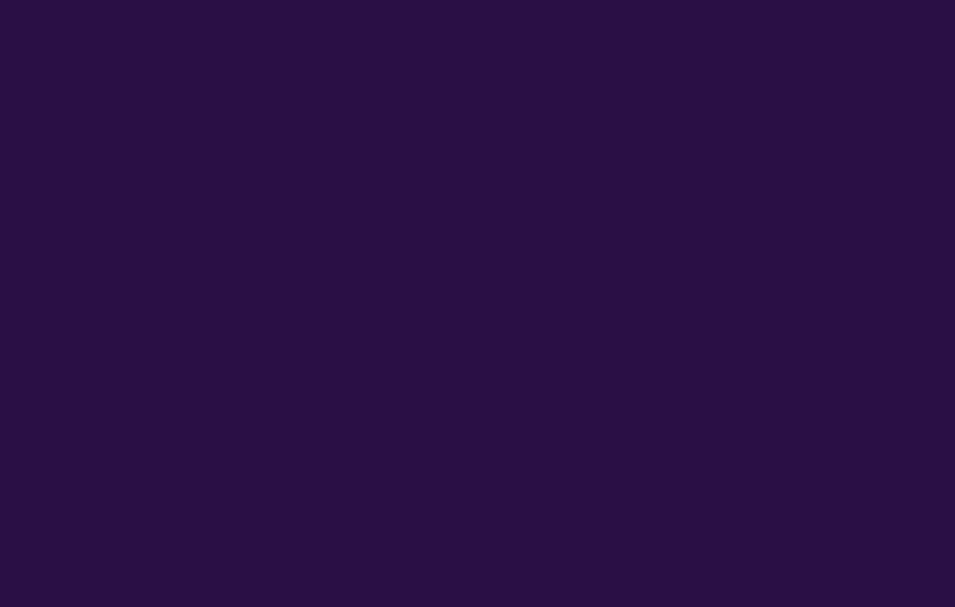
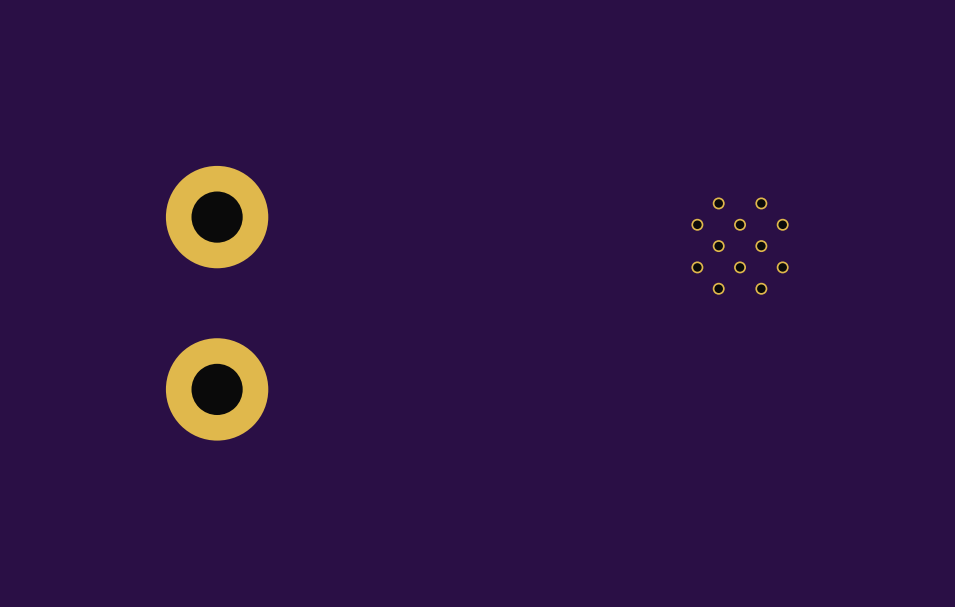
part: none -> (217, 217)
part: none -> (740, 246)
part: none -> (217, 389)

